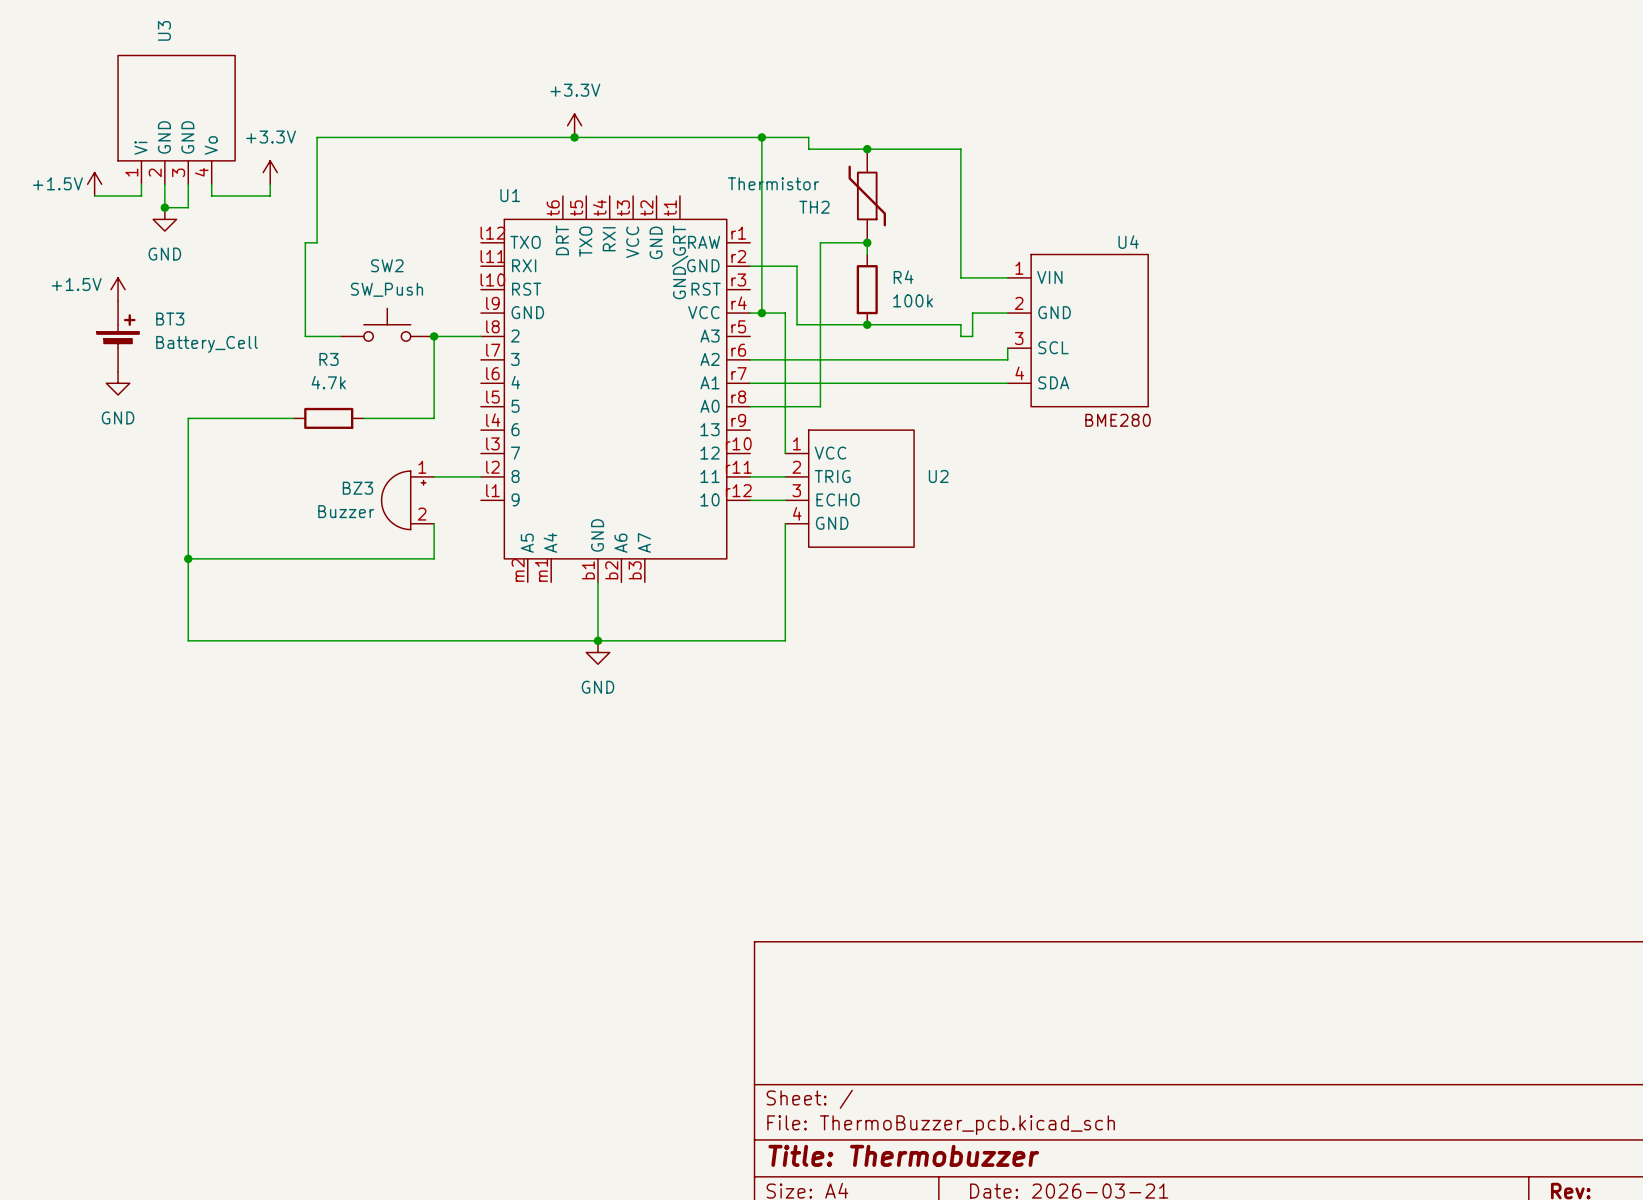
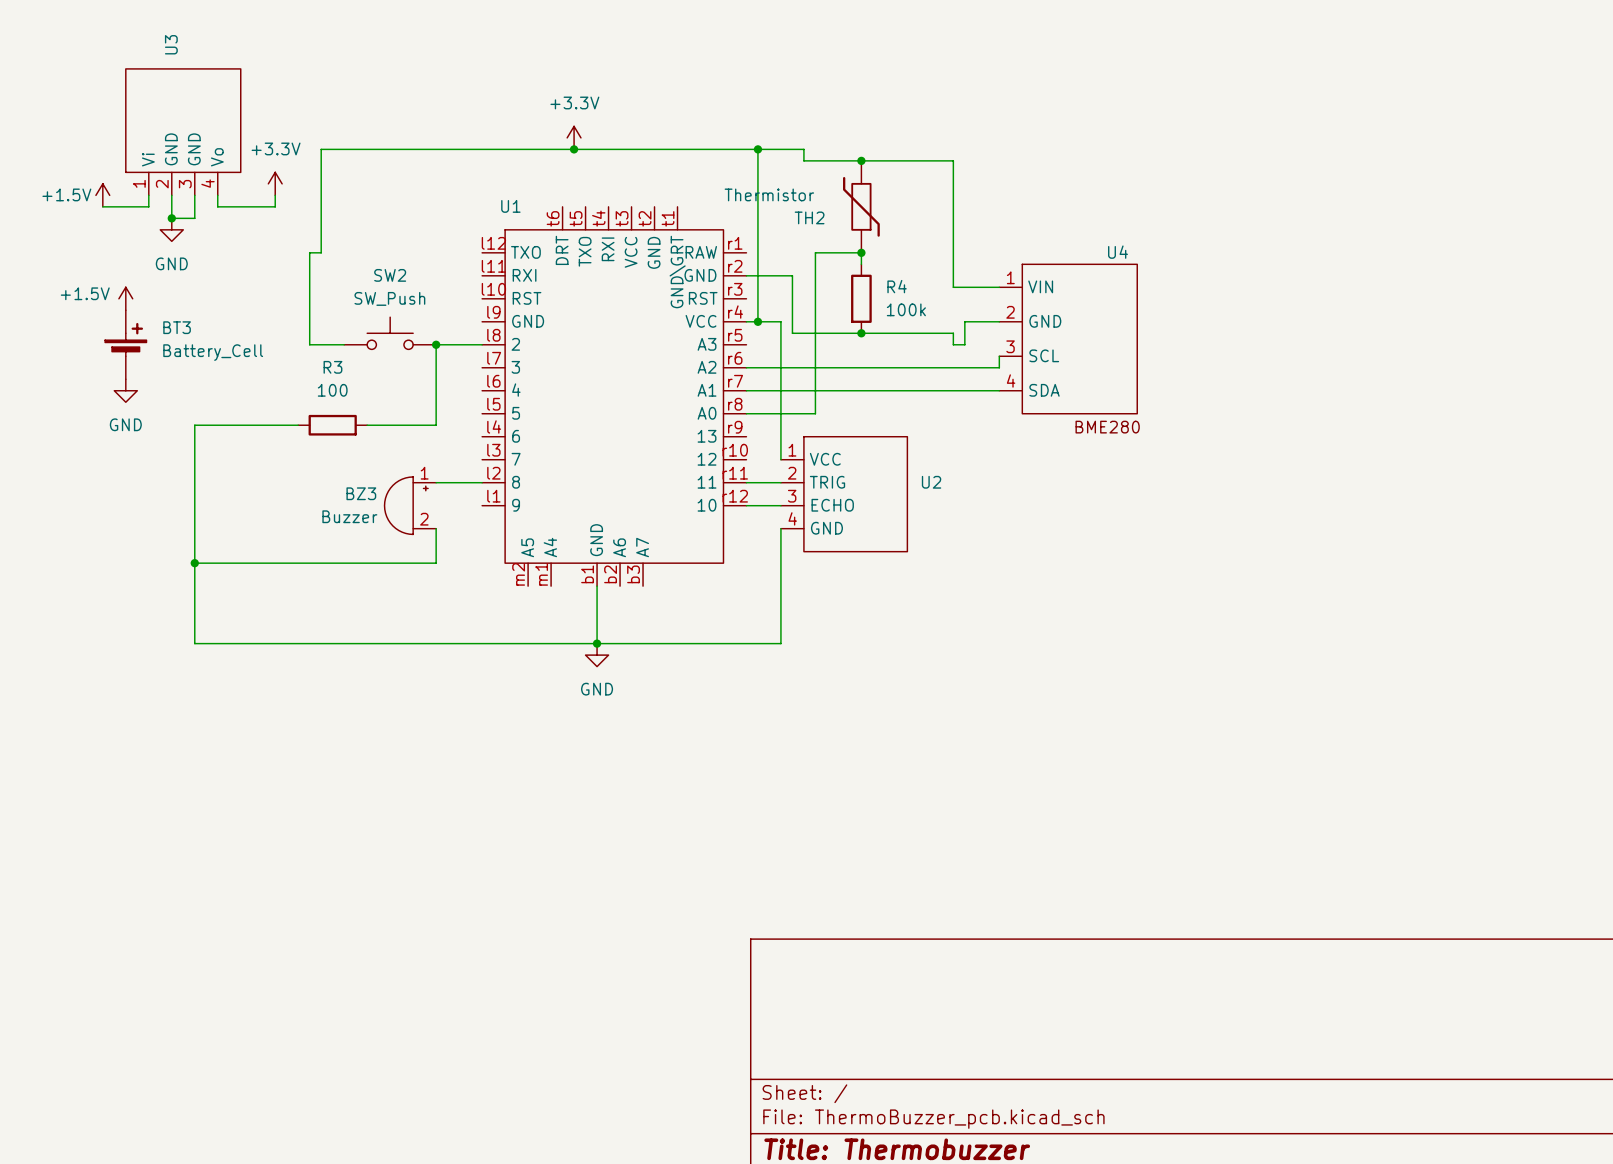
R3 value: 4.7k (328, 382) -> 100 (332, 390)

